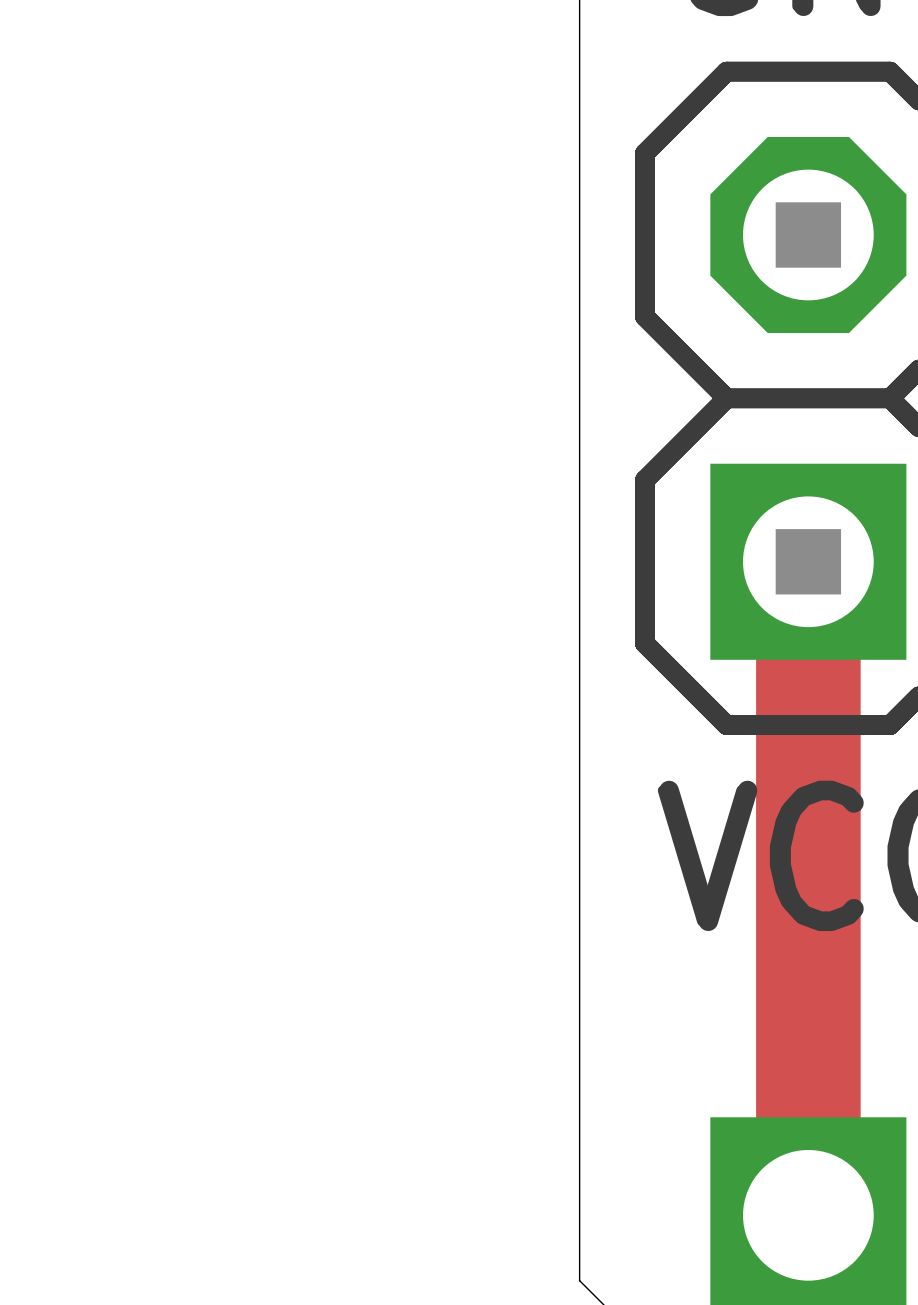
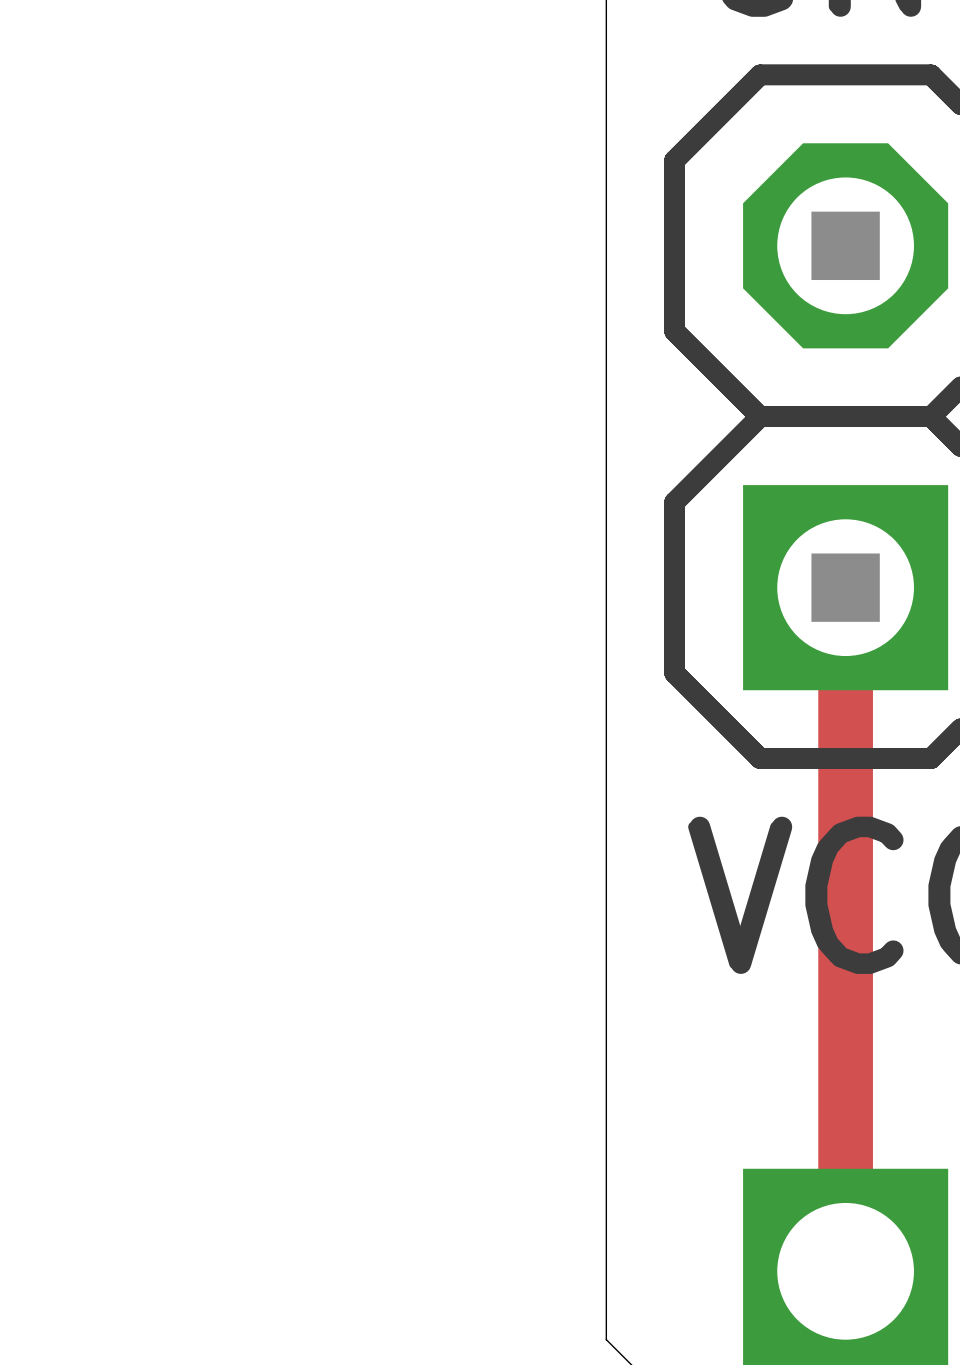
track width: thick (808, 561) (808, 1215) -> thin (845, 587) (845, 1271)

